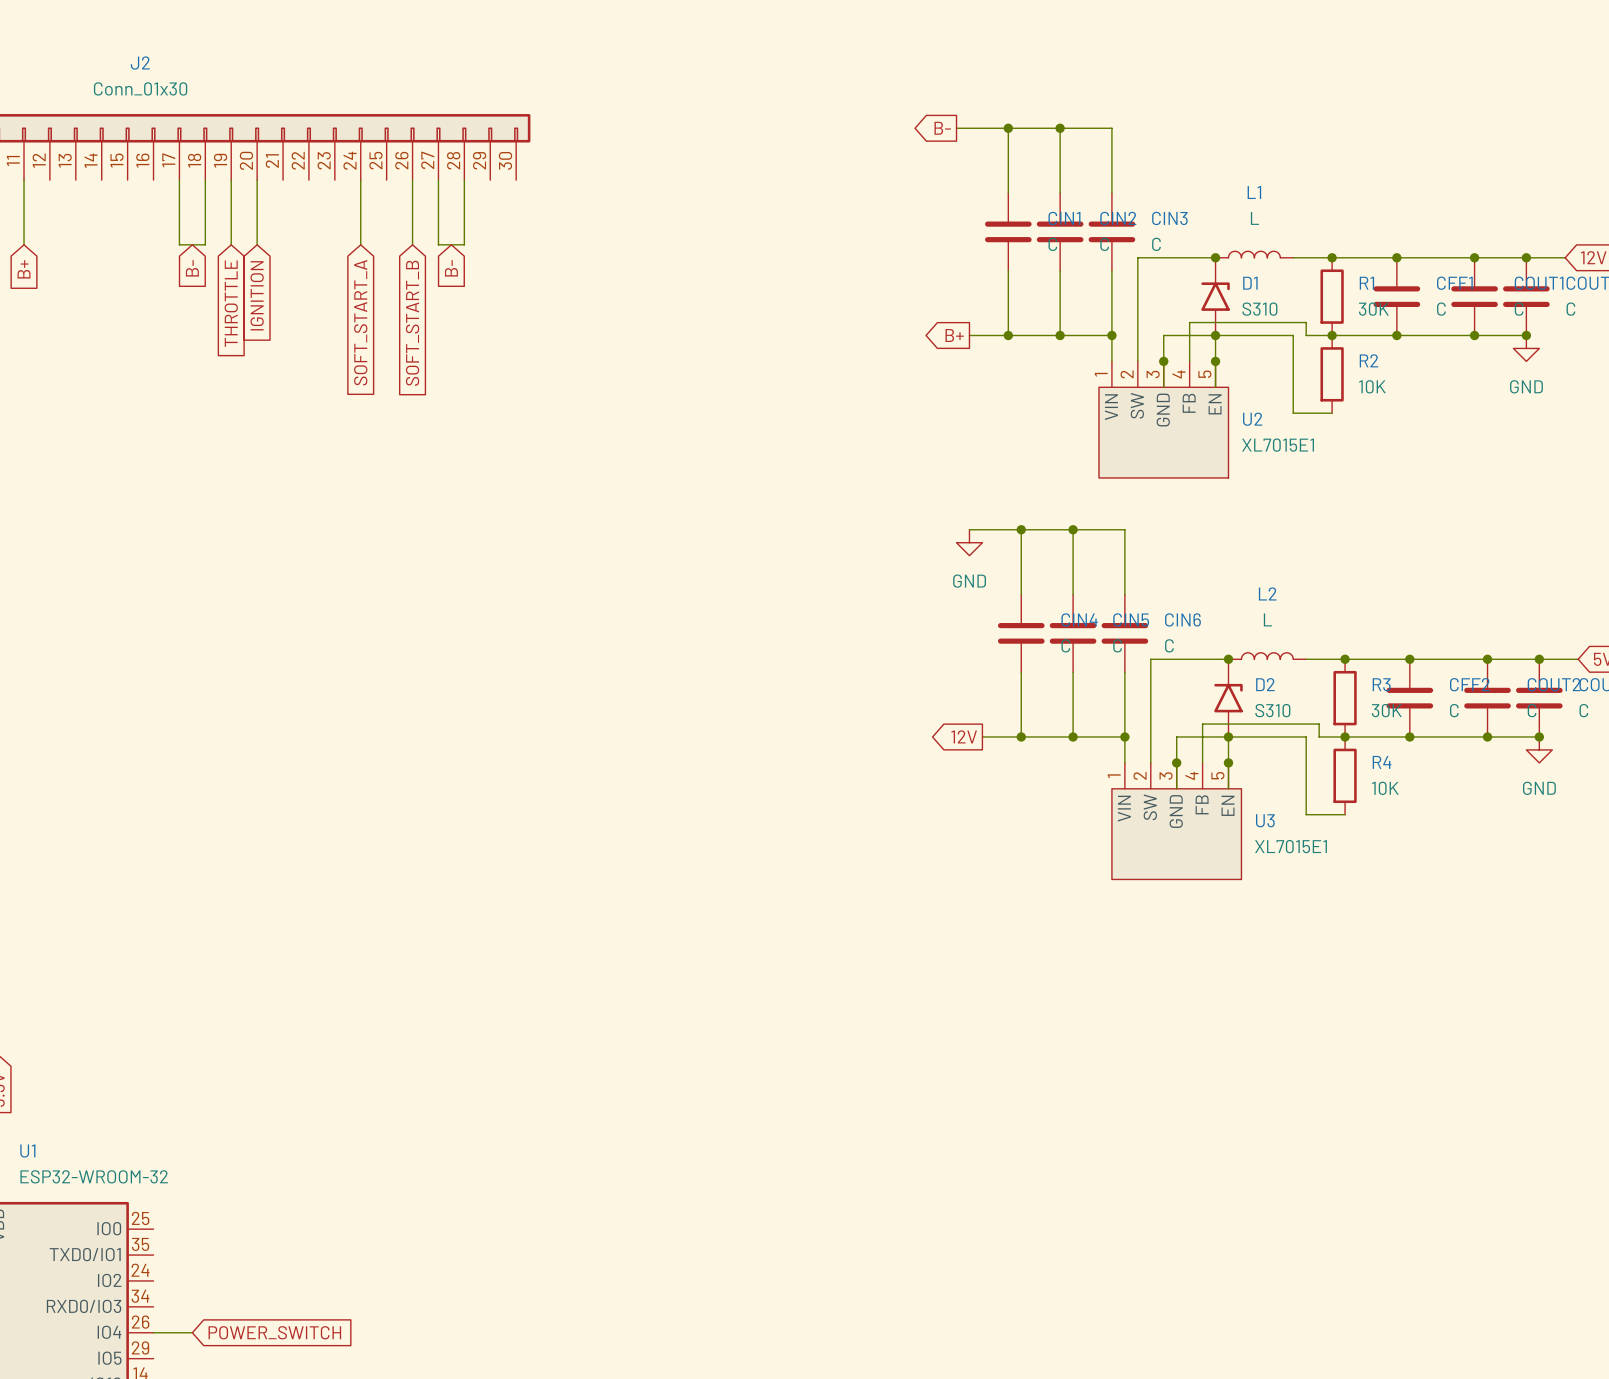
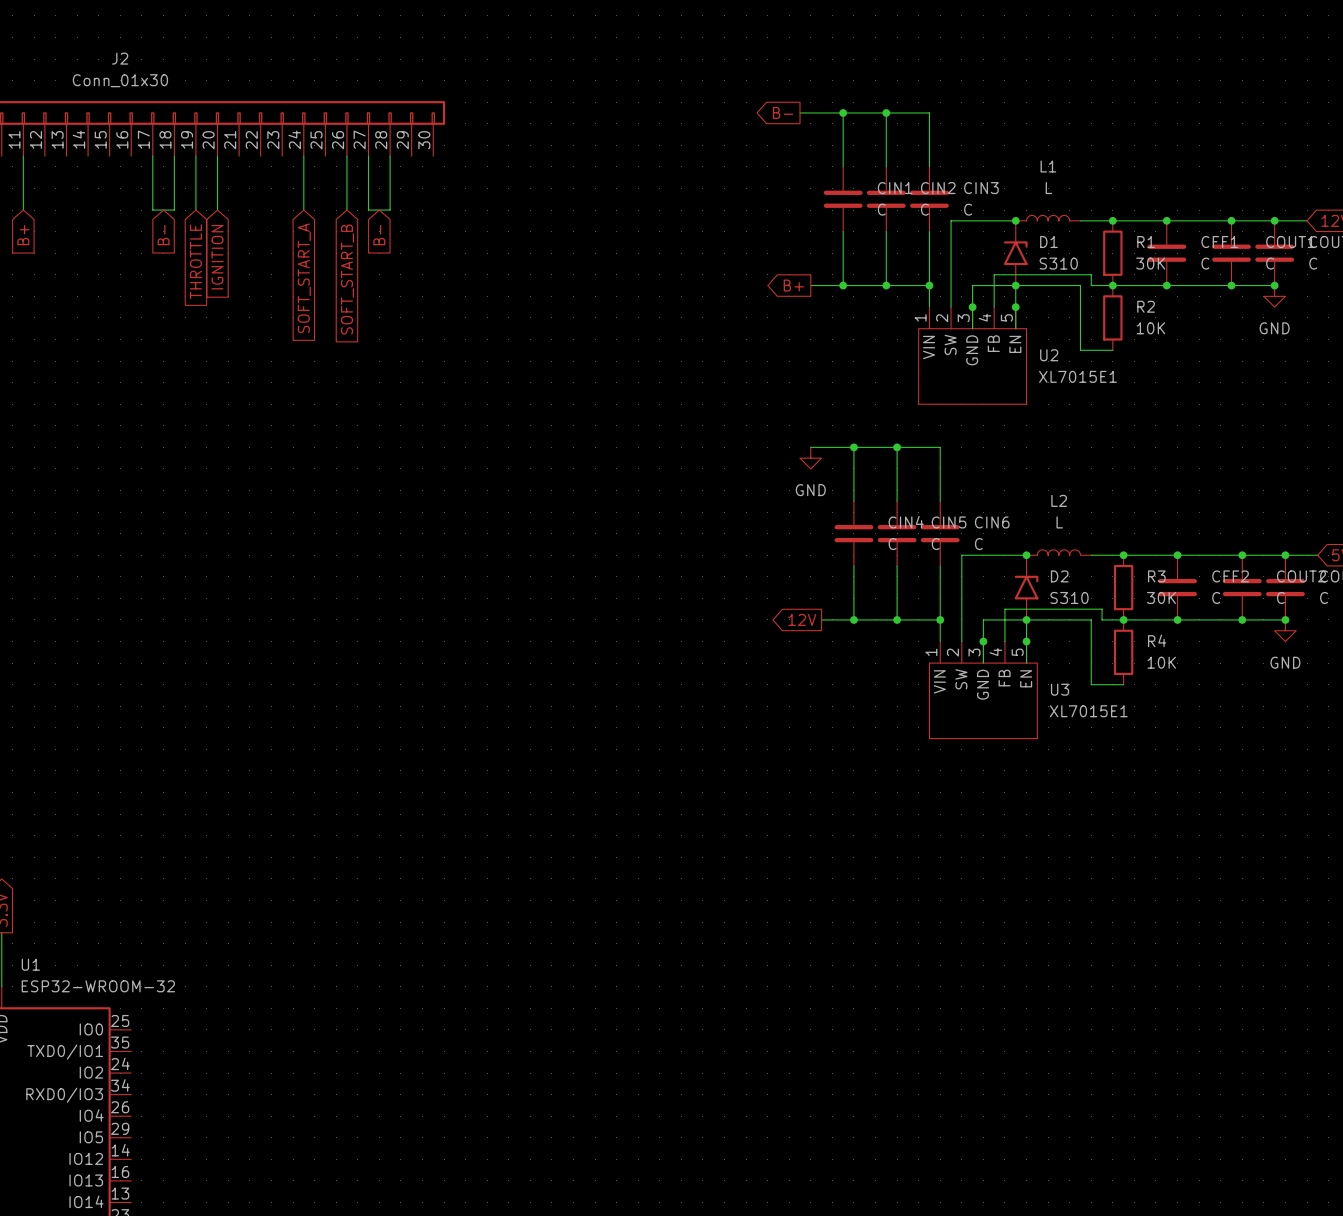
wire: (153, 1332) (192, 1332) -> none
global label: POWER_SWITCH (274, 1332) -> none

